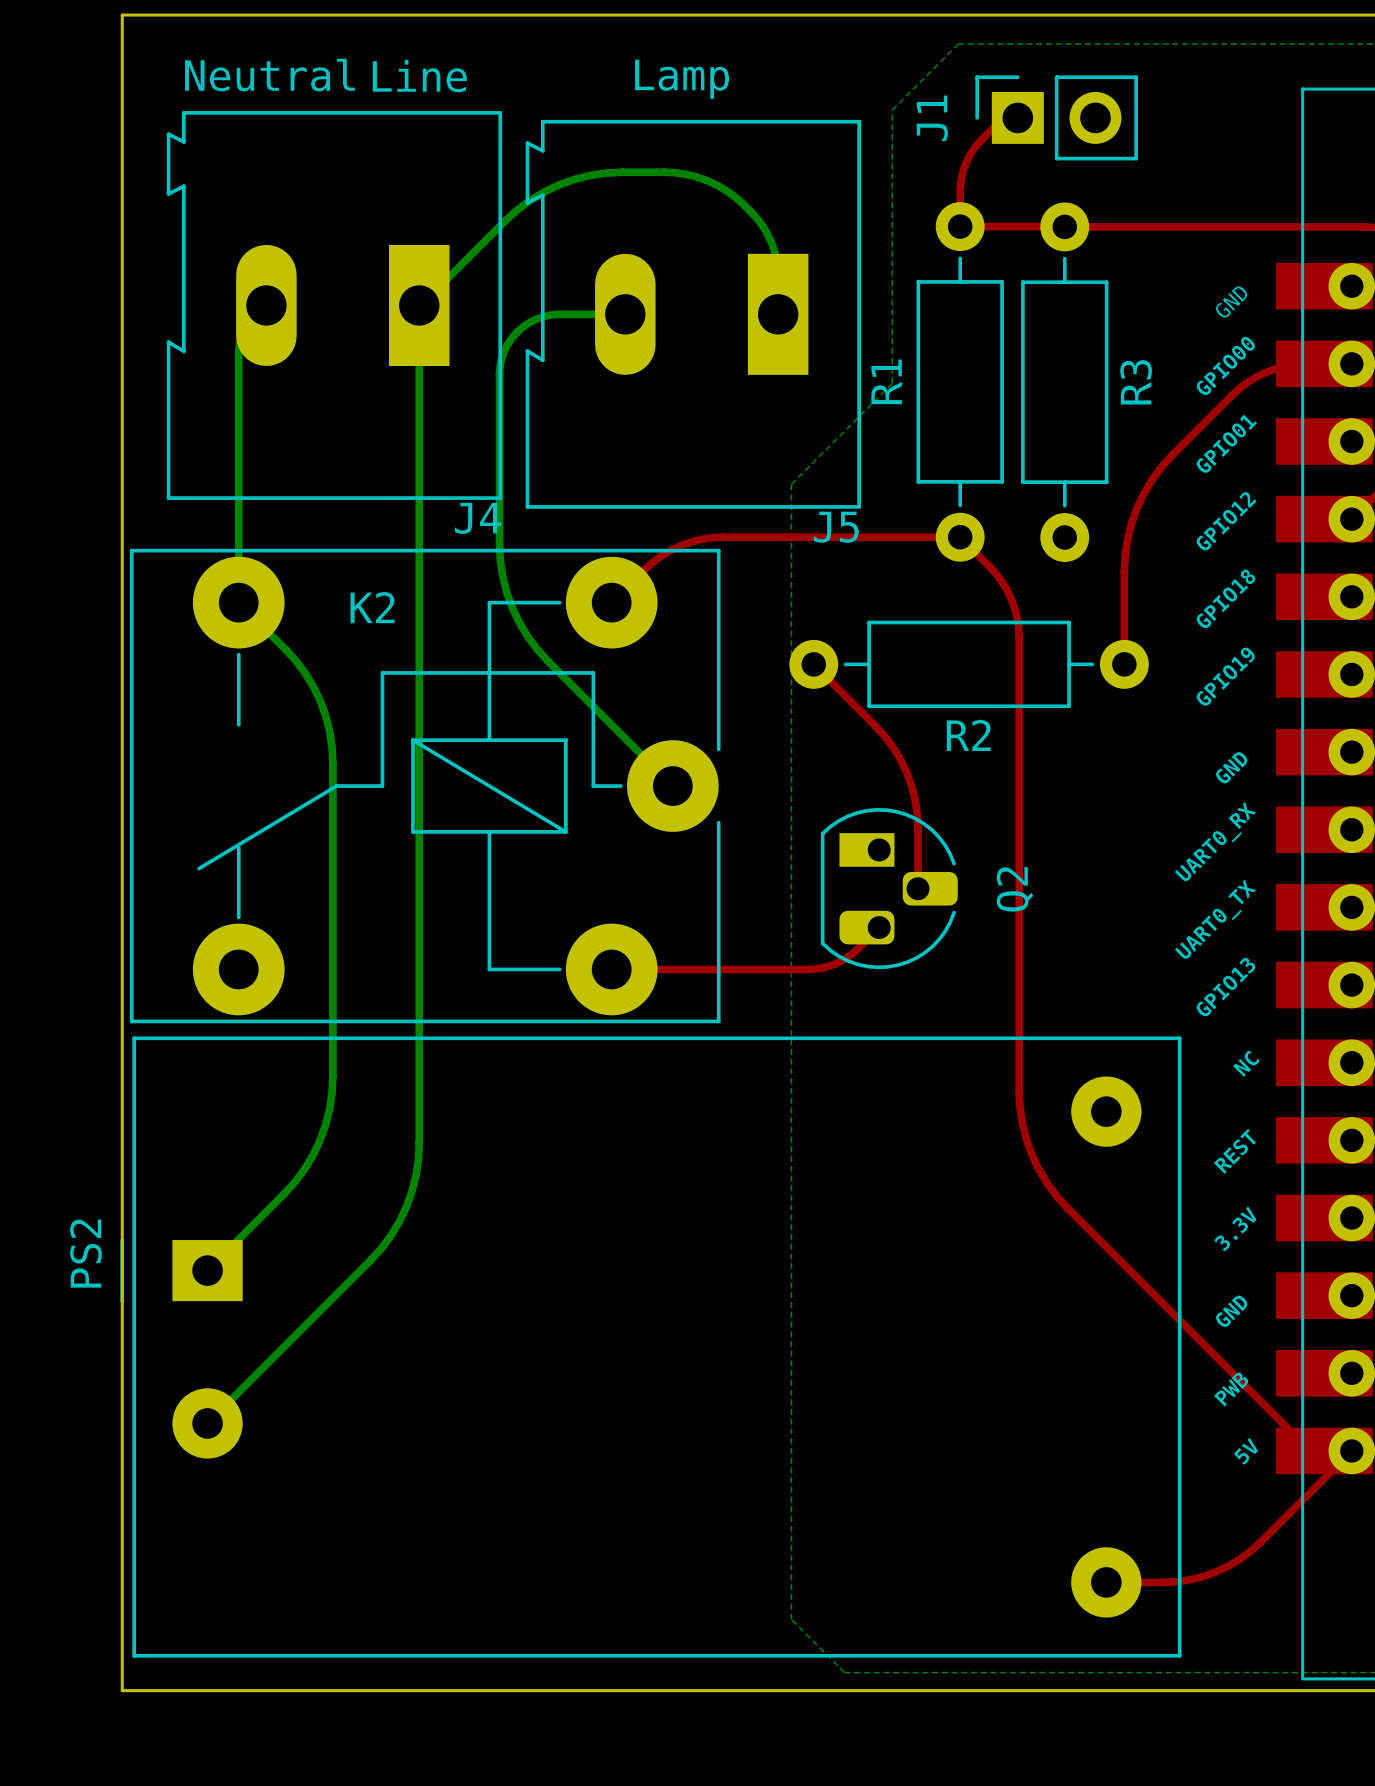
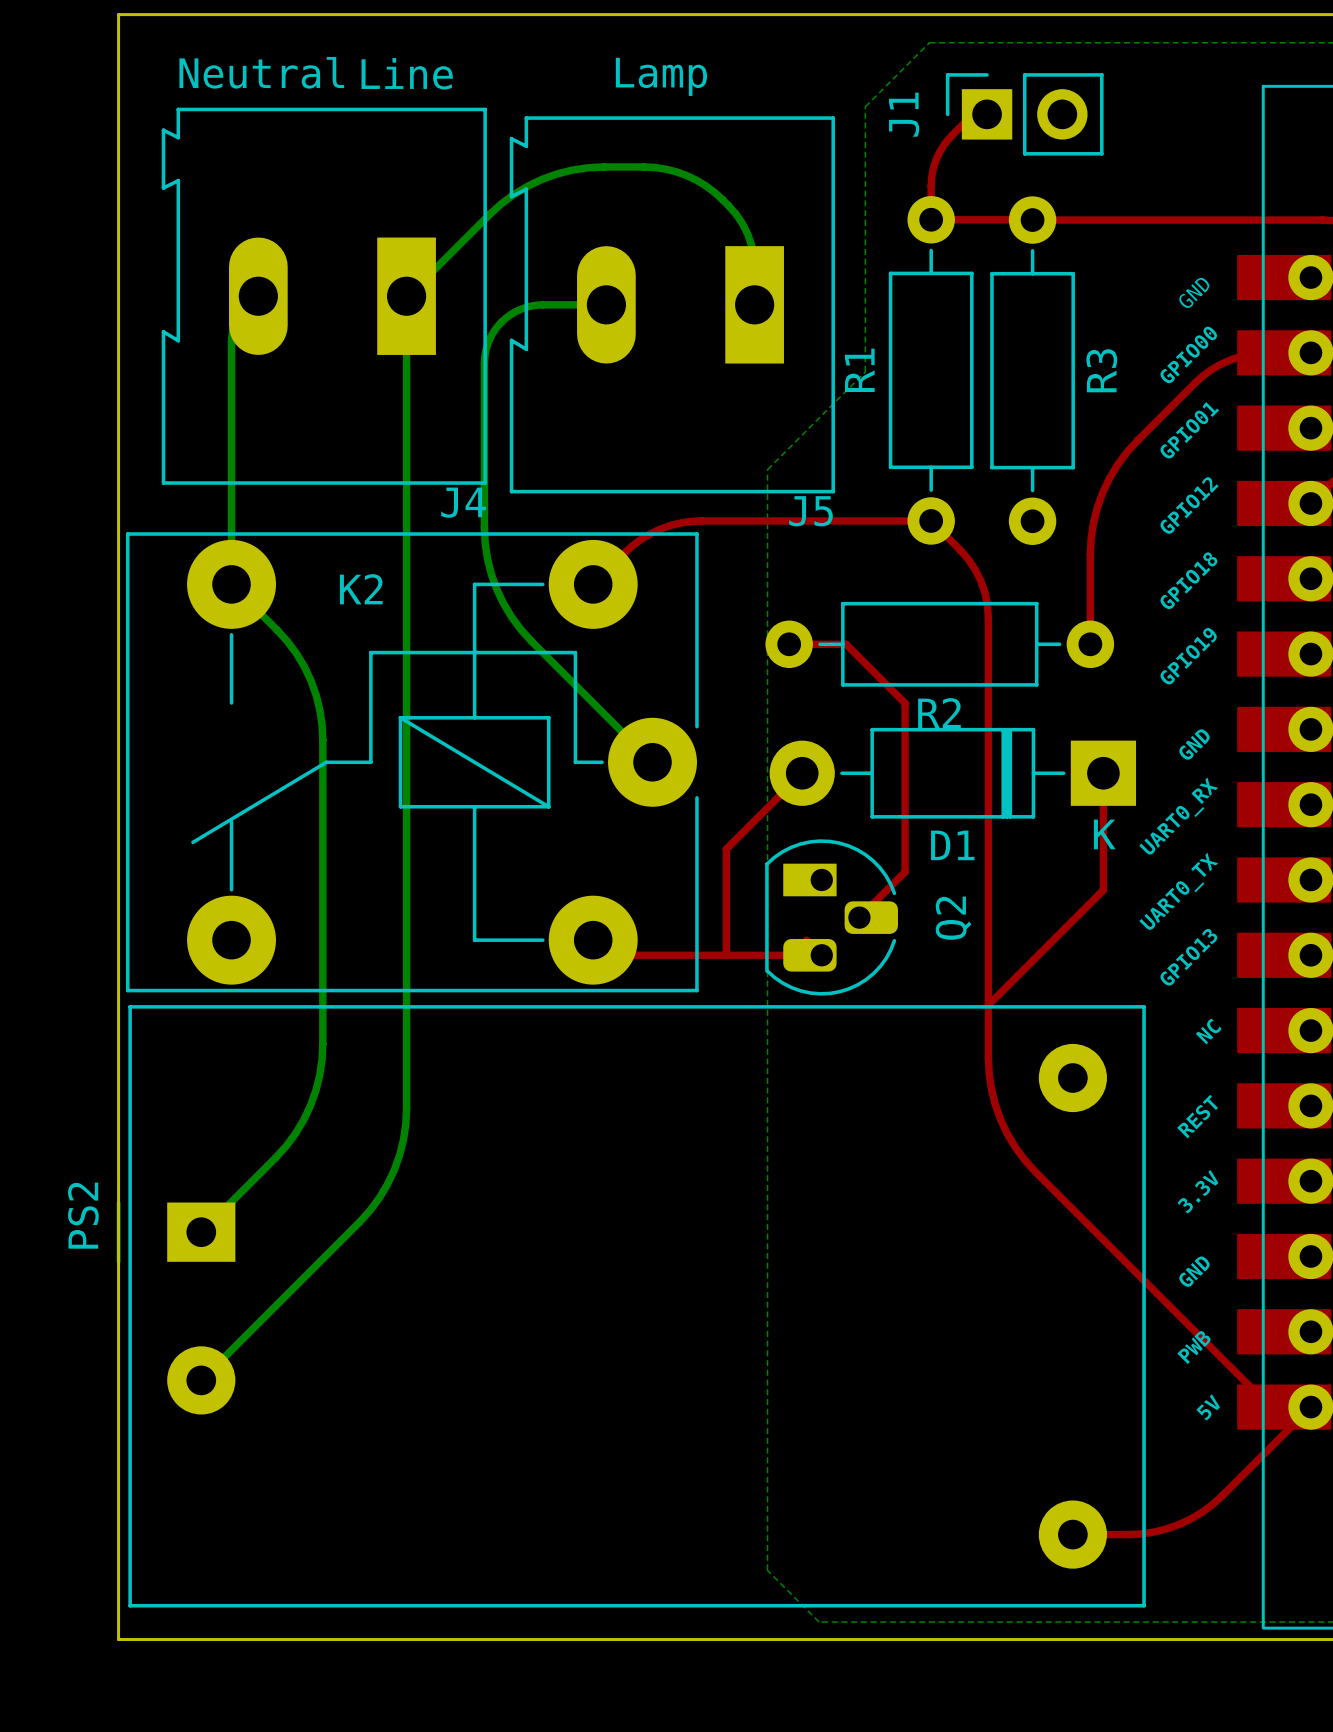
top track: (813, 664) (885, 736) (906, 773) (917, 814) (918, 888) -> (789, 644) (846, 644) (905, 703) (905, 871) (859, 917)
top track: none -> (802, 773) (726, 849) (726, 955)
D1: none -> (952, 773)
top track: none -> (1103, 773) (1103, 890) (988, 1005)
Q2 position: (889, 888) -> (831, 917)
top track: (879, 927) (843, 959) (817, 968) (615, 969) -> (806, 940) (821, 955) (613, 955) (597, 940)

